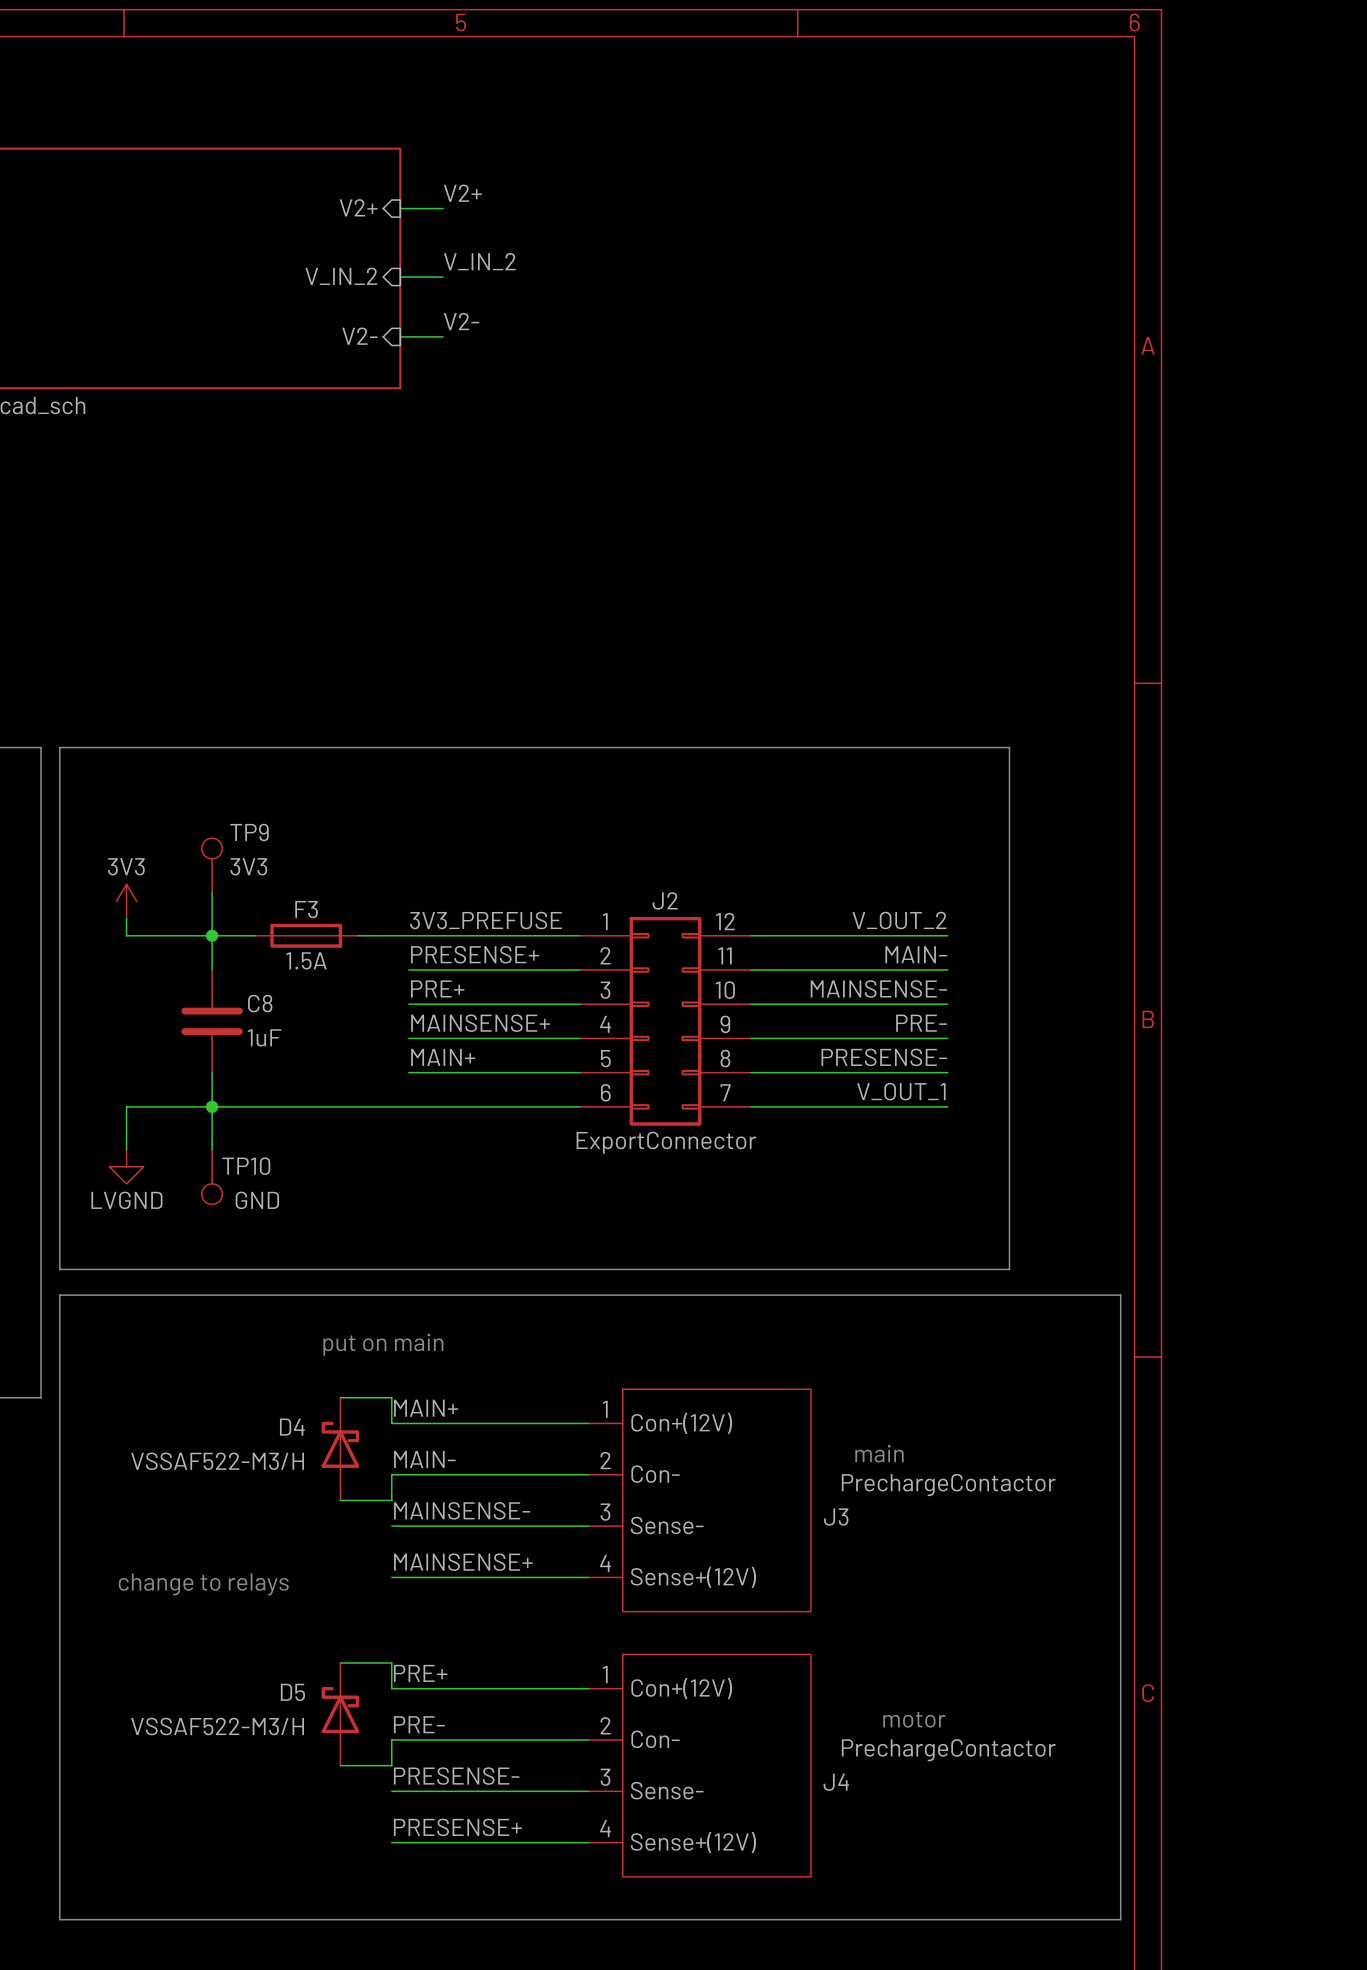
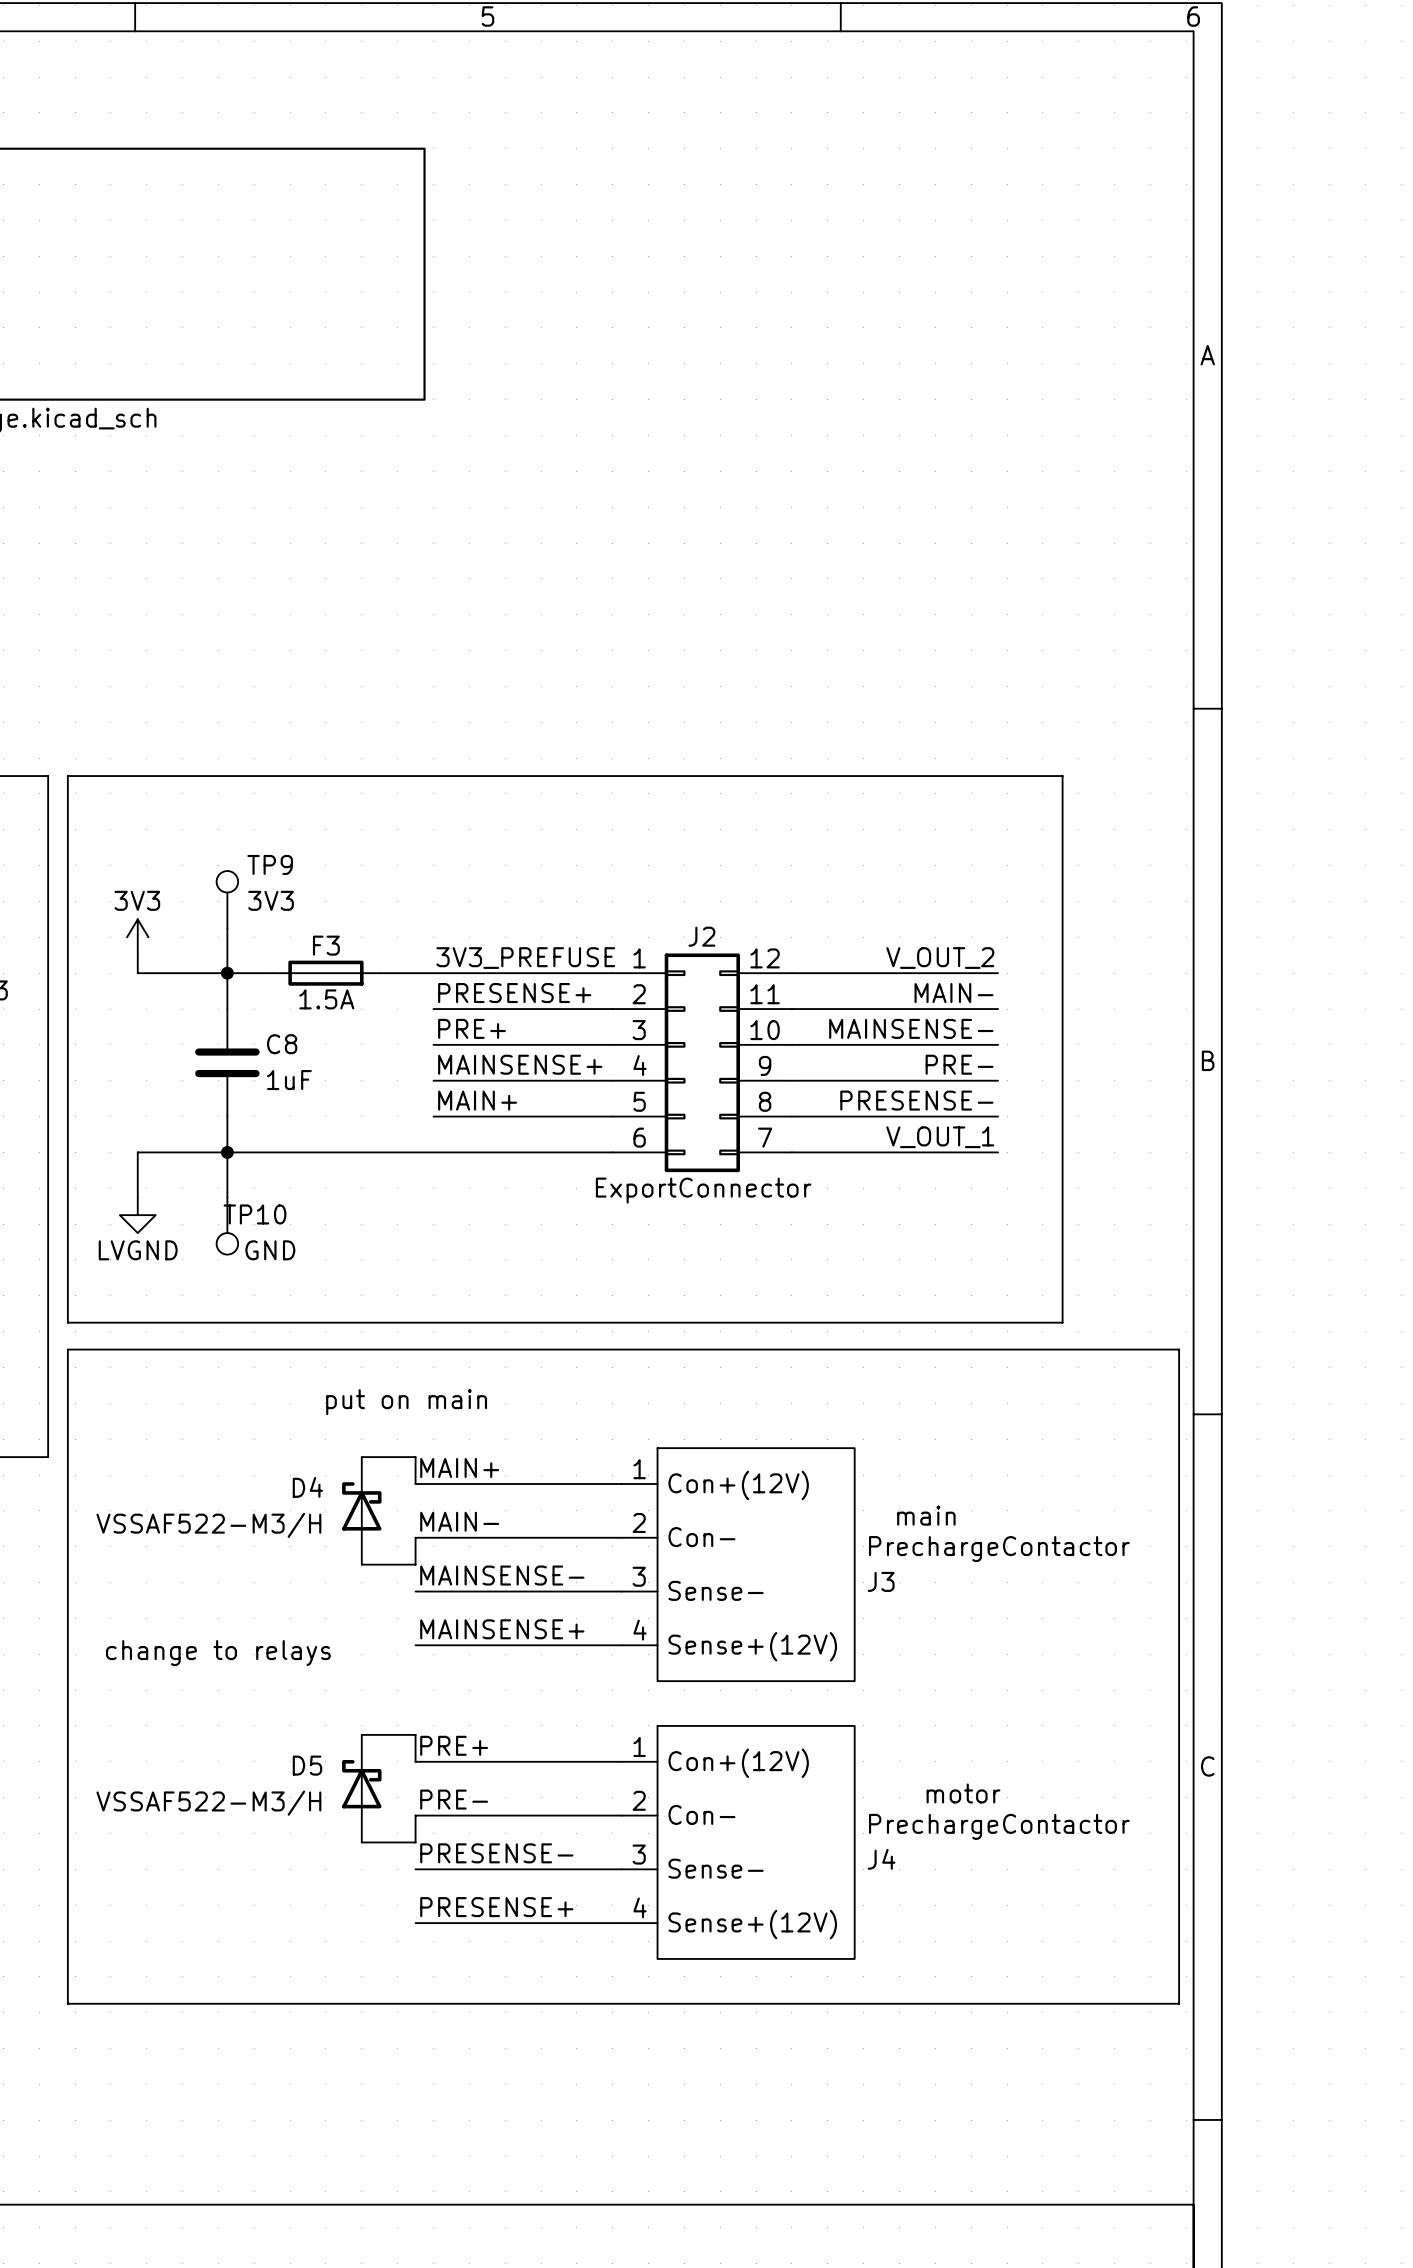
label: V2+ (462, 193) -> none
sheet pin: V2+ (358, 207) -> none
wire: (400, 208) (443, 208) -> none
label: V_IN_2 (479, 261) -> none
sheet pin: V_IN_2 (341, 276) -> none
wire: (400, 277) (443, 277) -> none
label: V2- (461, 321) -> none
sheet pin: V2- (359, 336) -> none
wire: (400, 336) (443, 336) -> none

